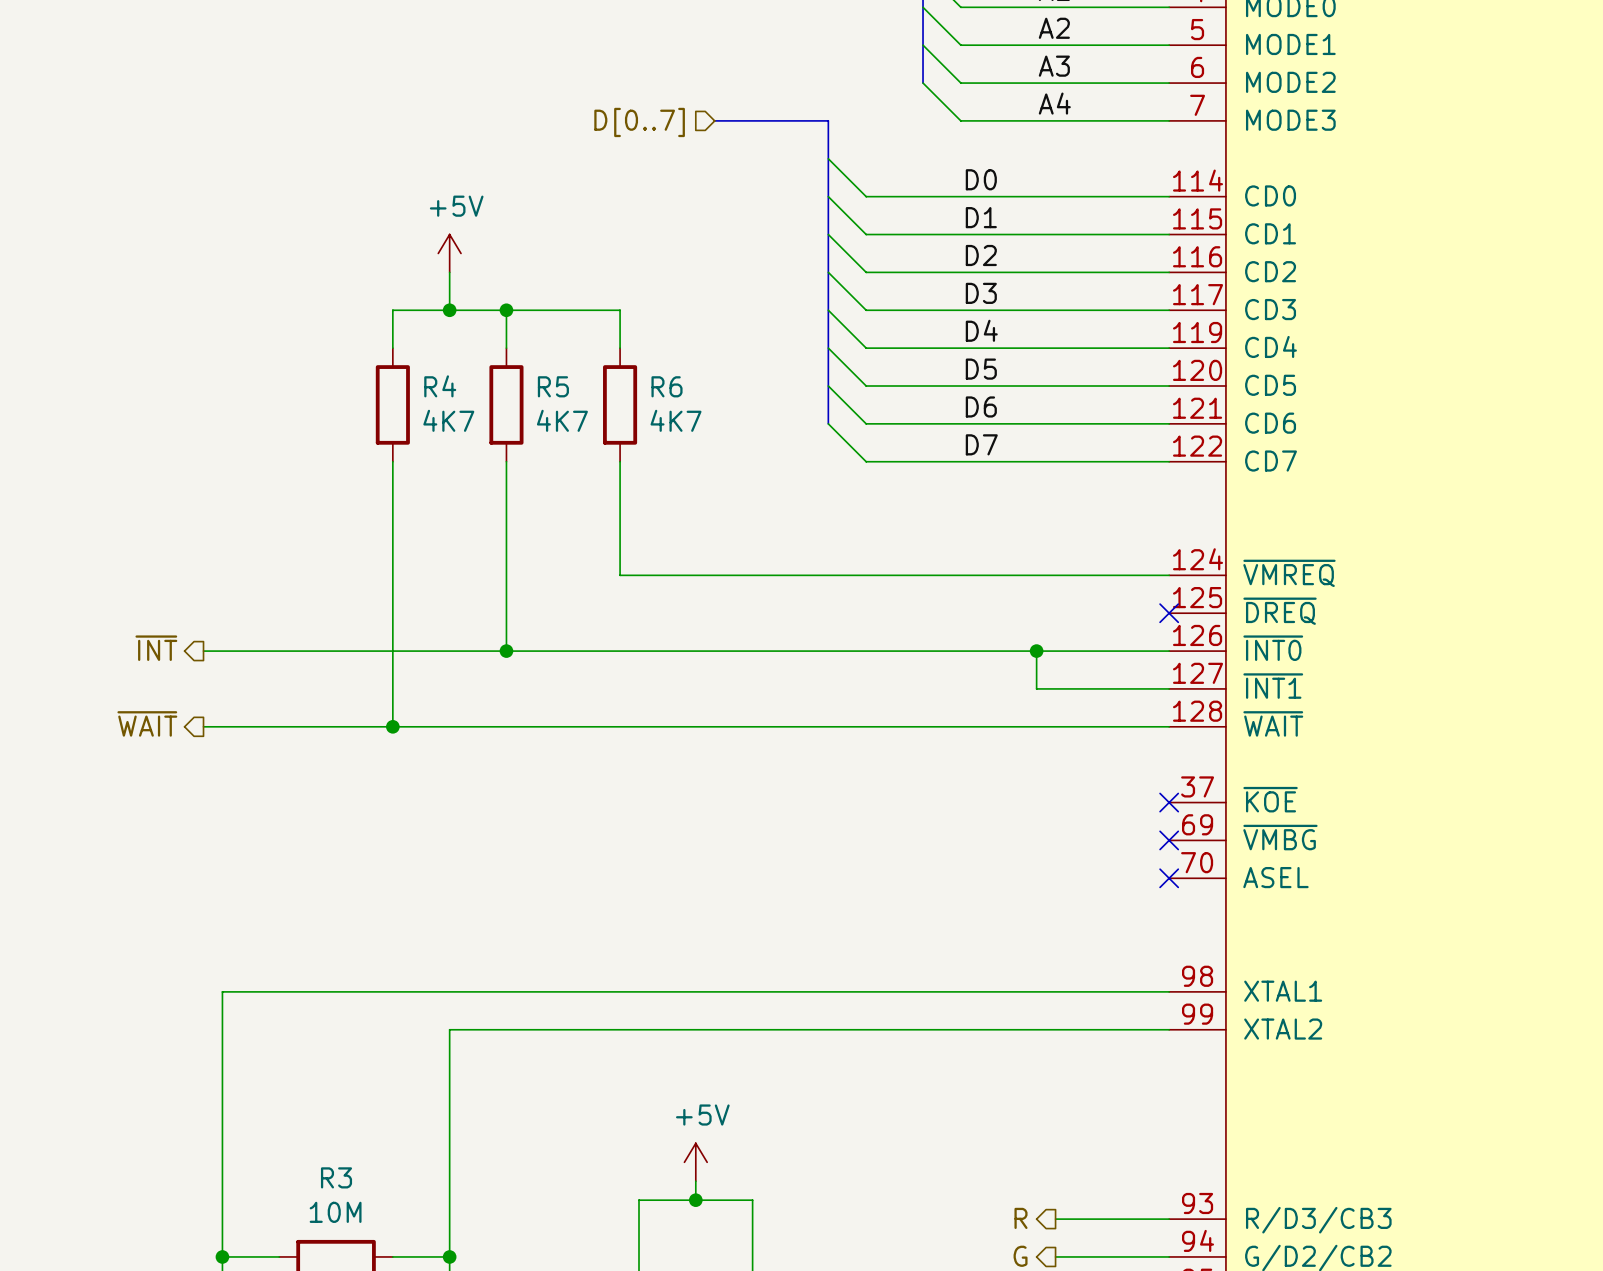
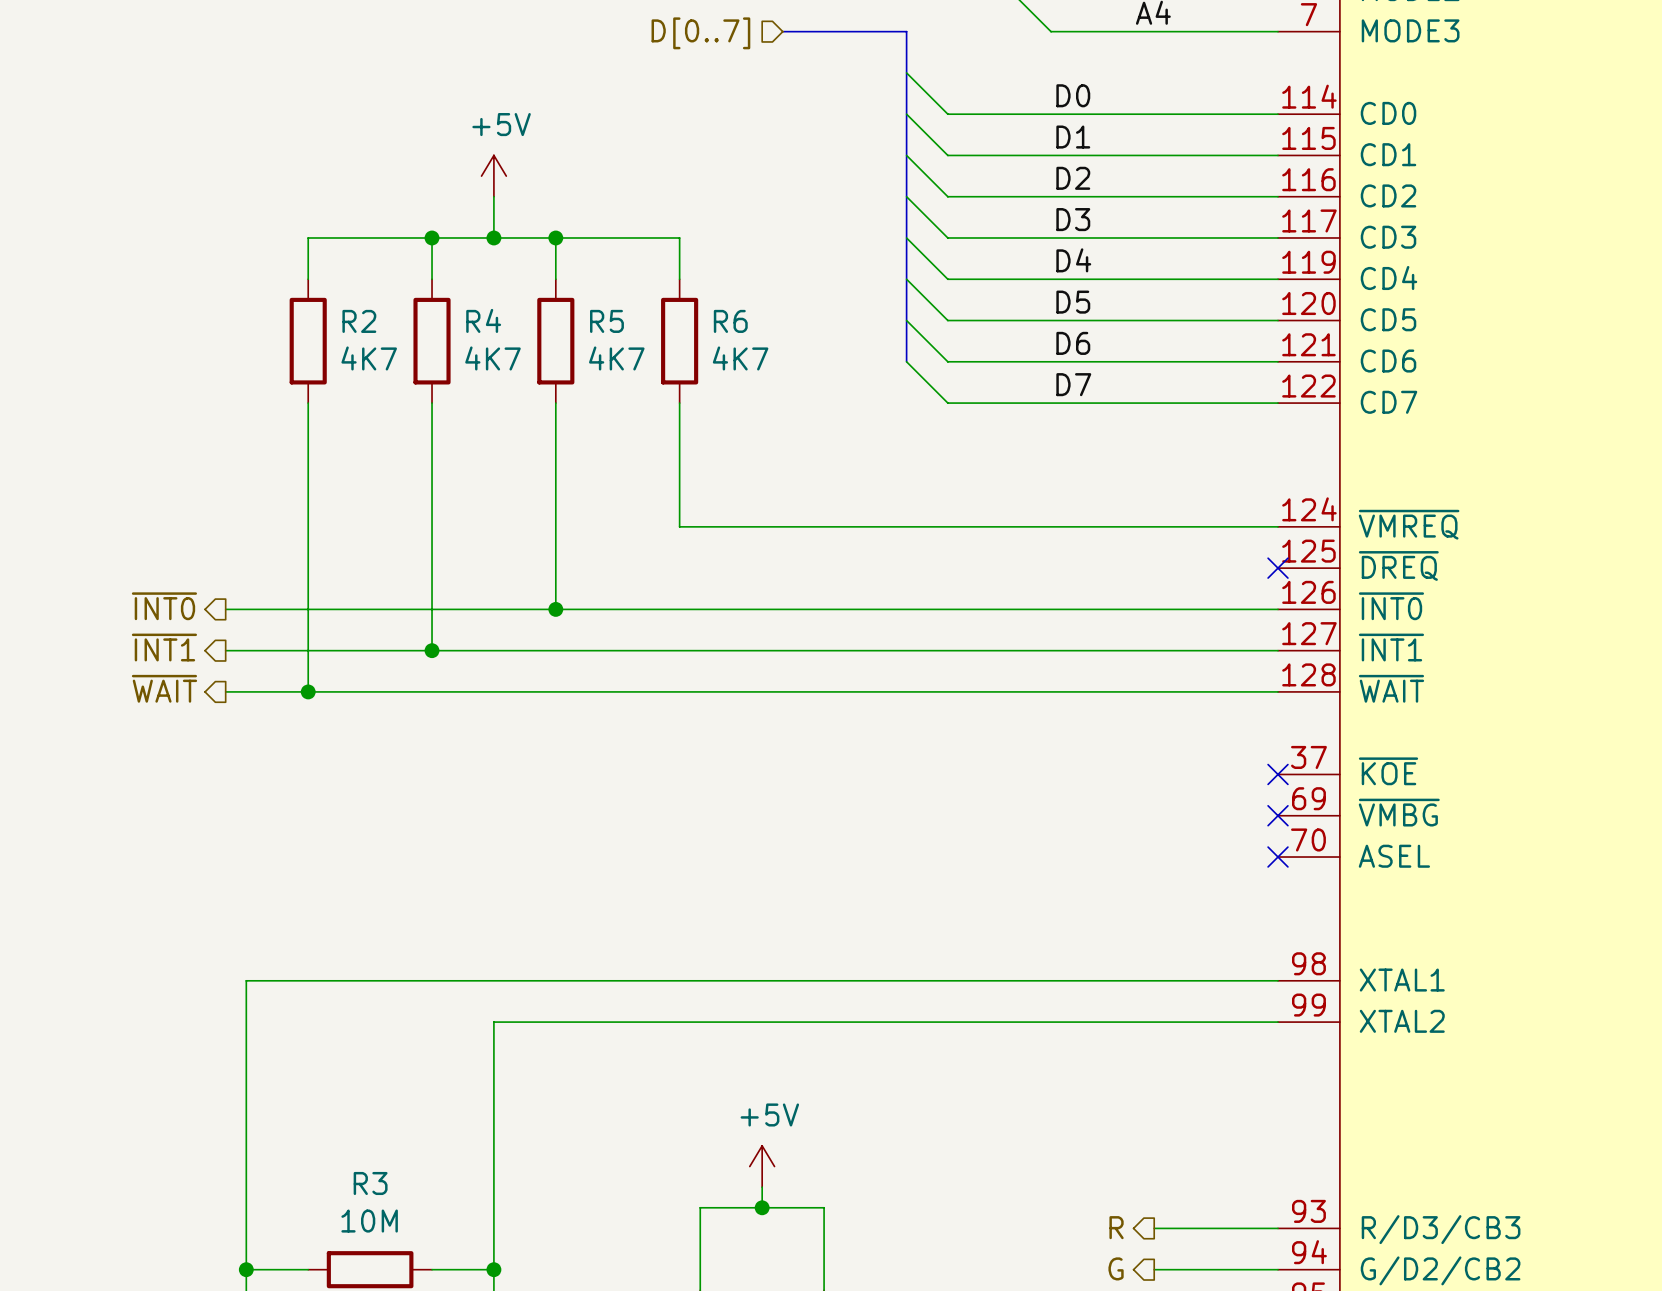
wire: none -> (432, 237) (308, 237) (308, 279)
junction: none -> (432, 237)
R2: none -> 4K7 (308, 341)
wire: none -> (308, 403) (308, 691)
hierarchical label: ~{INT} (156, 648) -> ~{INT0} (164, 606)
wire: (1036, 651) (1036, 688) -> (225, 650) (1133, 650)
junction: (1036, 651) -> none
hierarchical label: none -> ~{INT1} (164, 647)
wire: (392, 688) (392, 726) -> none
junction: none -> (308, 691)
junction position: (392, 726) -> (432, 650)

